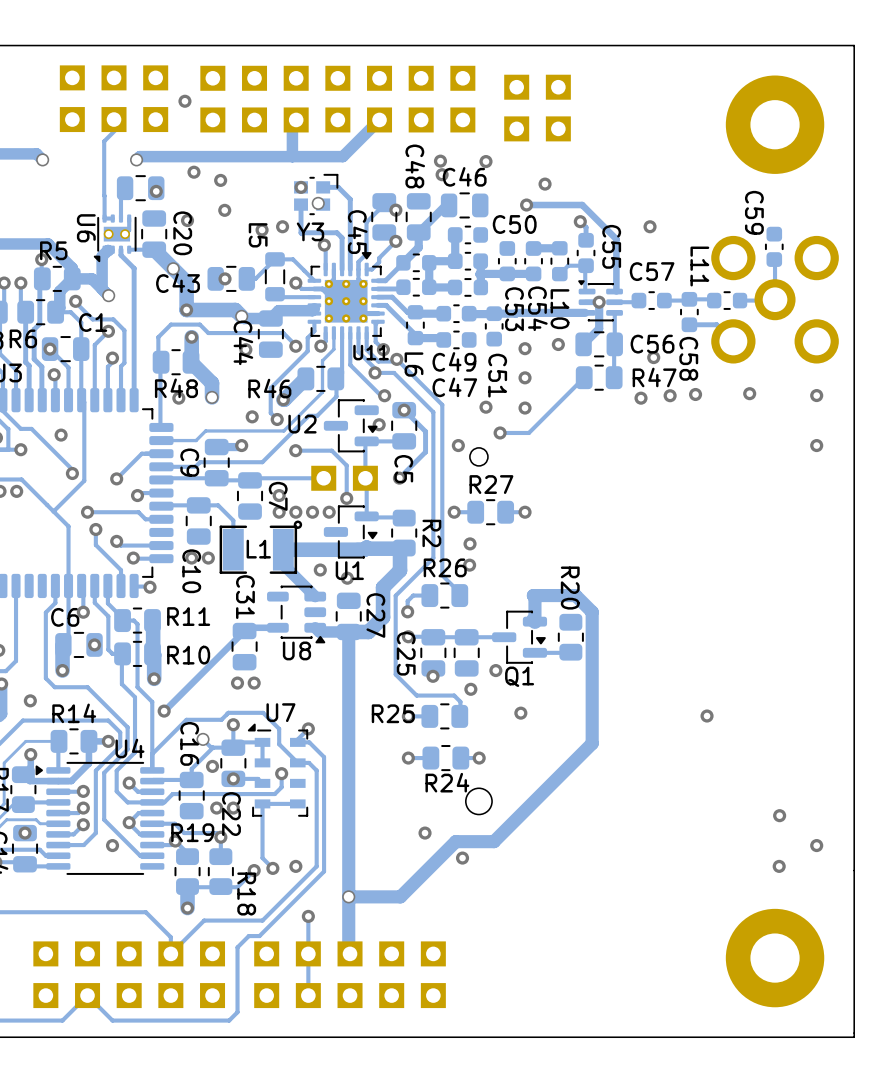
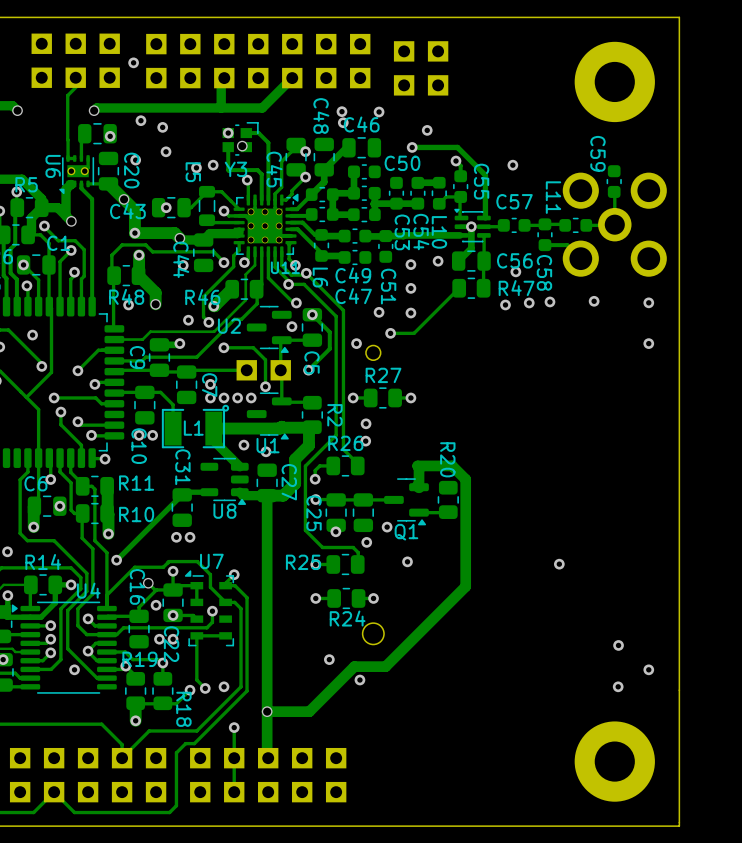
U11 footprint: [307, 252, 385, 340] -> [233, 193, 299, 258]
U2 footprint: [323, 399, 379, 453] -> [246, 305, 292, 353]
U1 footprint: [323, 505, 379, 559] -> [246, 392, 292, 440]
U8 footprint: [267, 585, 327, 644] -> [200, 457, 249, 505]
Q1 footprint: [492, 610, 548, 664] -> [384, 478, 429, 526]

